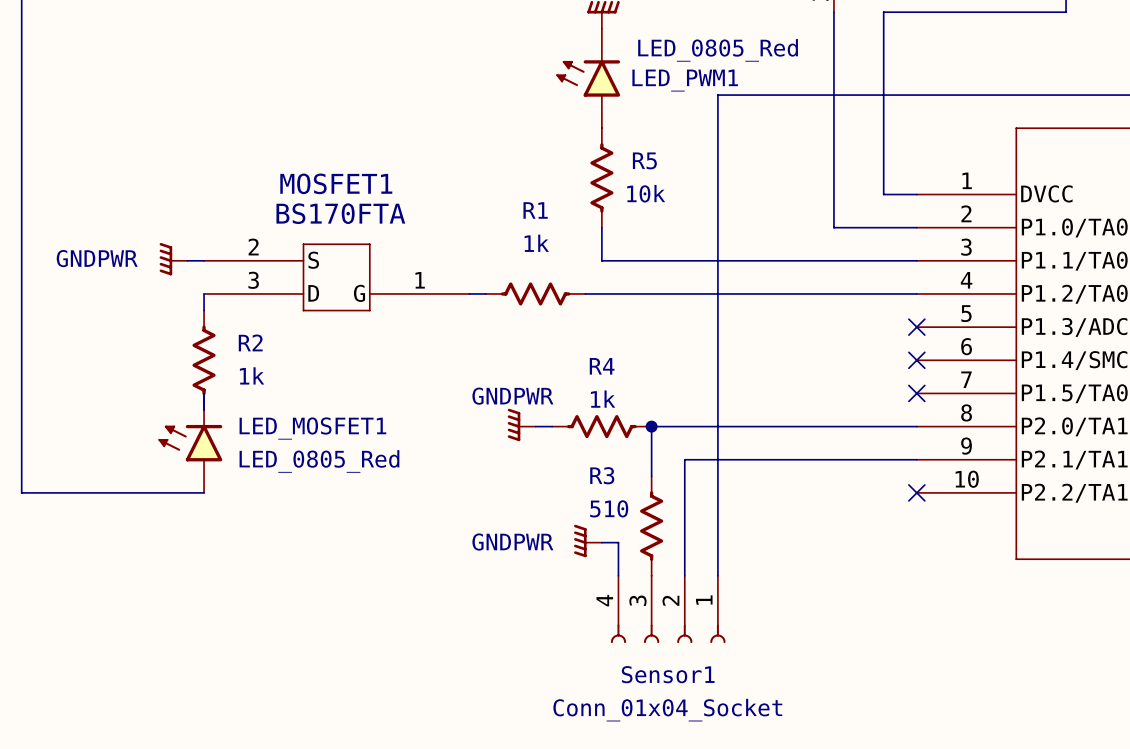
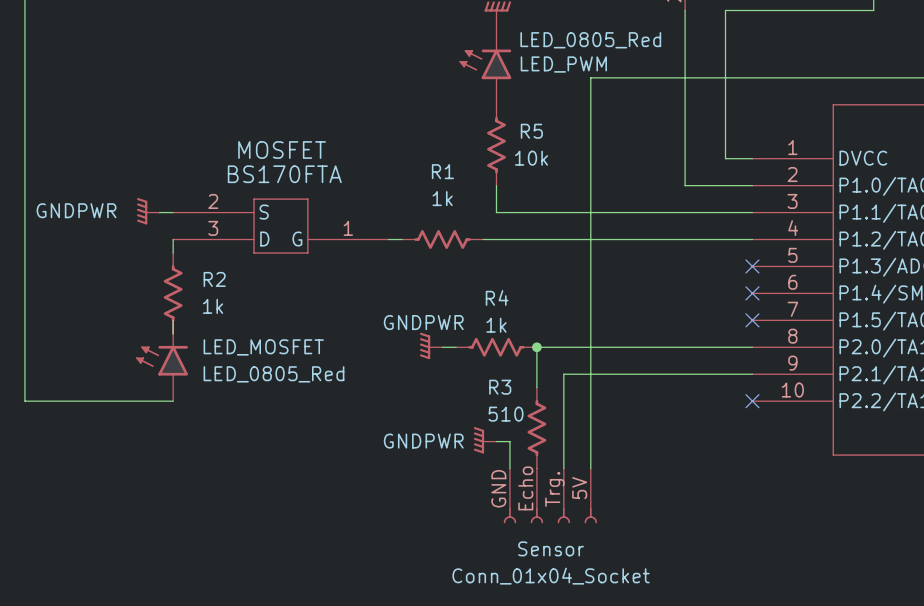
LED_PWM1 name: LED_PWM1 (685, 80) -> LED_PWM (563, 64)
MOSFET1 name: MOSFET1 (336, 183) -> MOSFET (282, 150)
LED_MOSFET1 name: LED_MOSFET1 (312, 428) -> LED_MOSFET (263, 347)
Sensor1 pin number: 4 (604, 600) -> GND (498, 488)
Sensor1 pin number: 3 (637, 600) -> Echo (525, 488)
Sensor1 pin number: 2 (670, 600) -> Trg. (554, 489)
Sensor1 pin number: 1 (704, 600) -> 5V (579, 488)
Sensor1 name: Sensor1 (668, 674) -> Sensor (551, 548)

